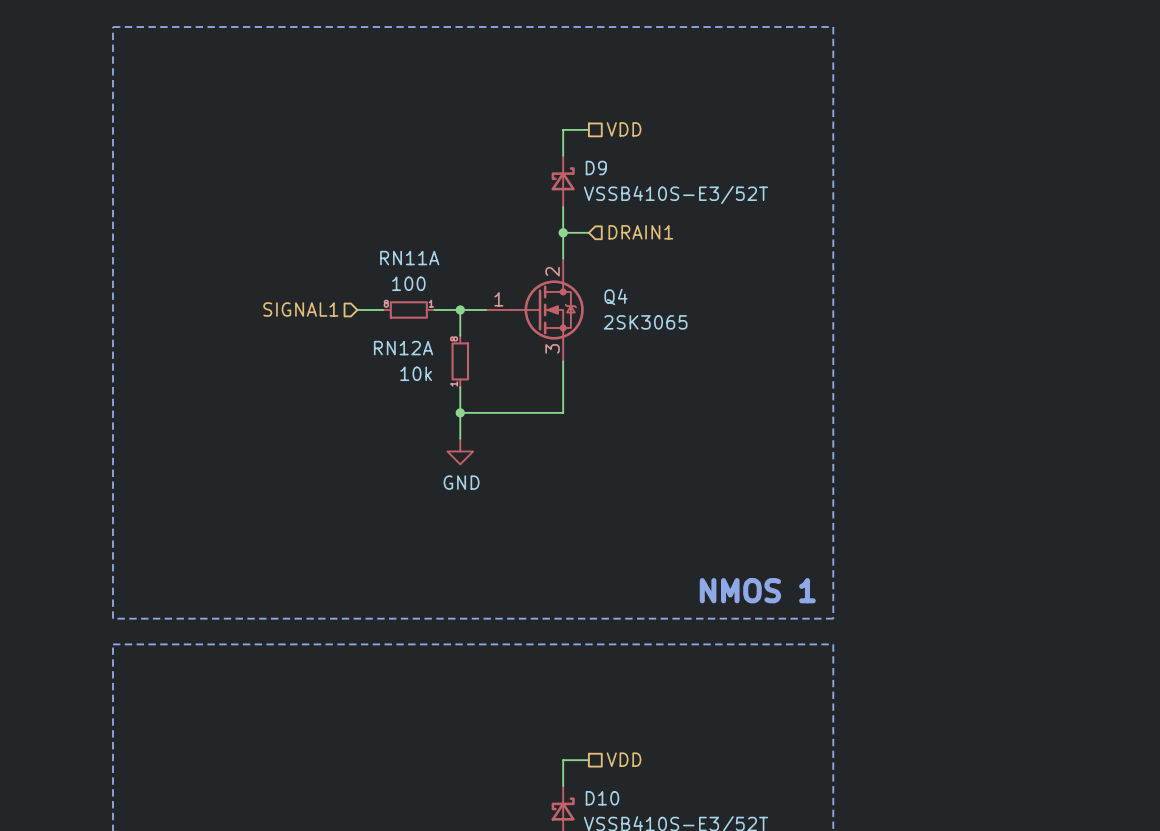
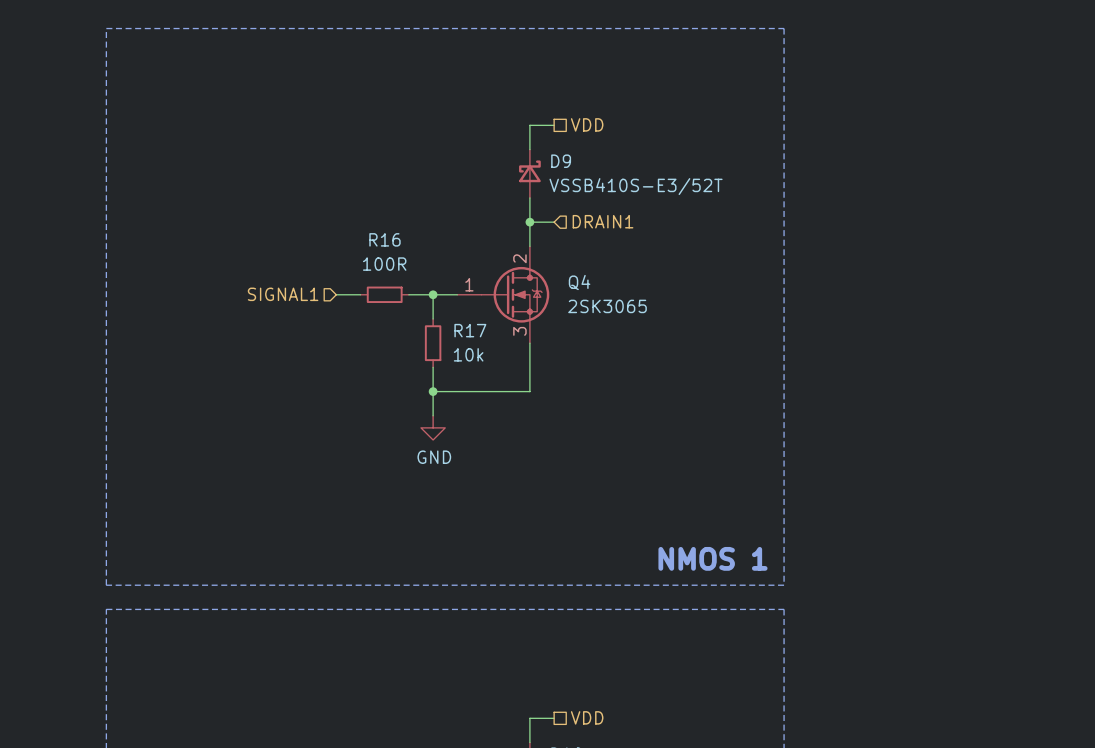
RN11A: 100 (408, 309) -> none
R16: none -> 100R (384, 294)
RN12A: 10k (460, 361) -> none
R17: none -> 10k (433, 343)

